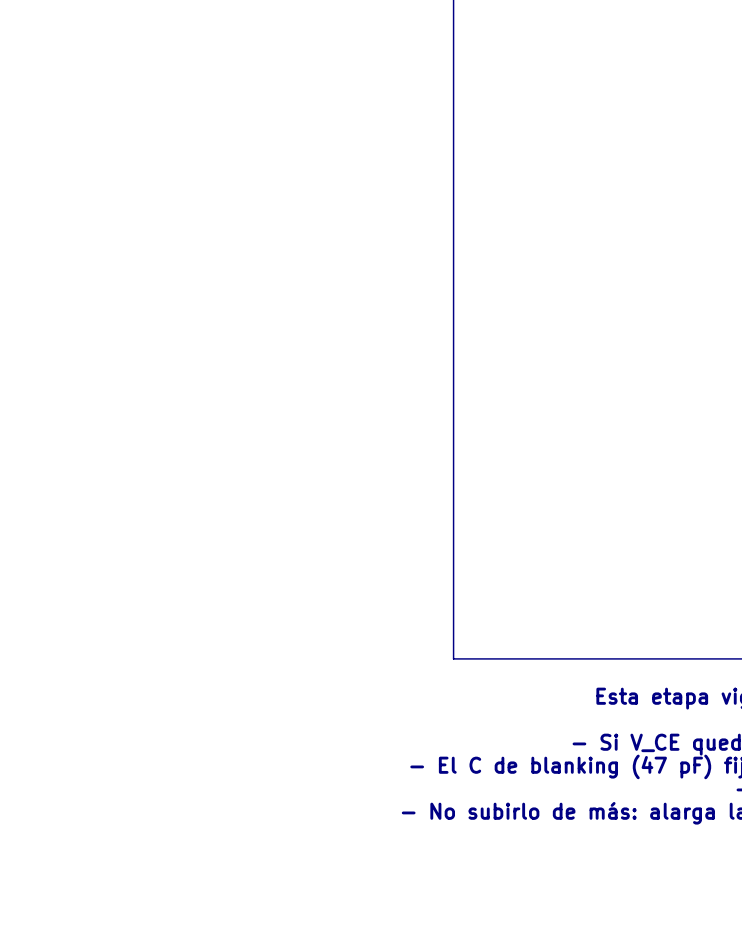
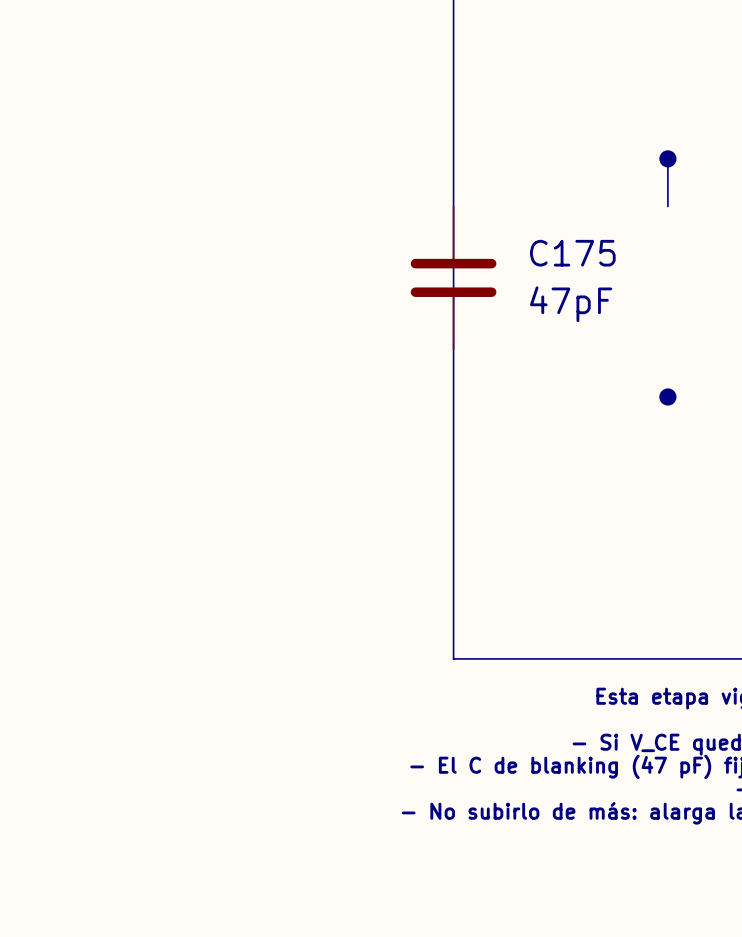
wire: none -> (667, 158) (667, 206)
junction: none -> (667, 158)
C175: none -> 47pF (453, 277)
junction: none -> (667, 396)

